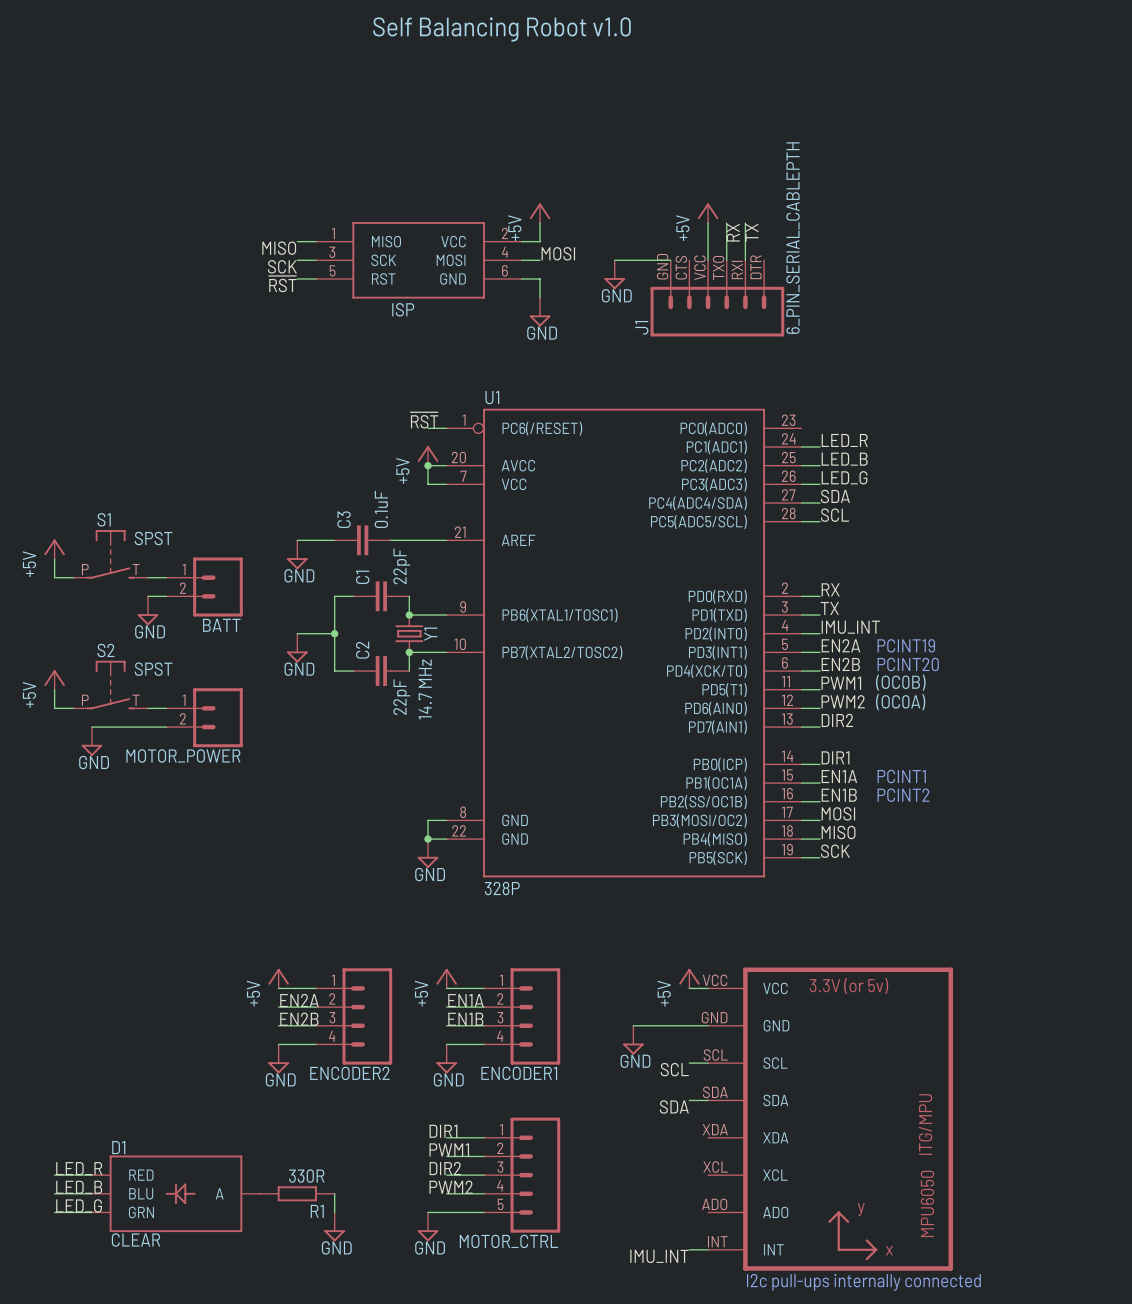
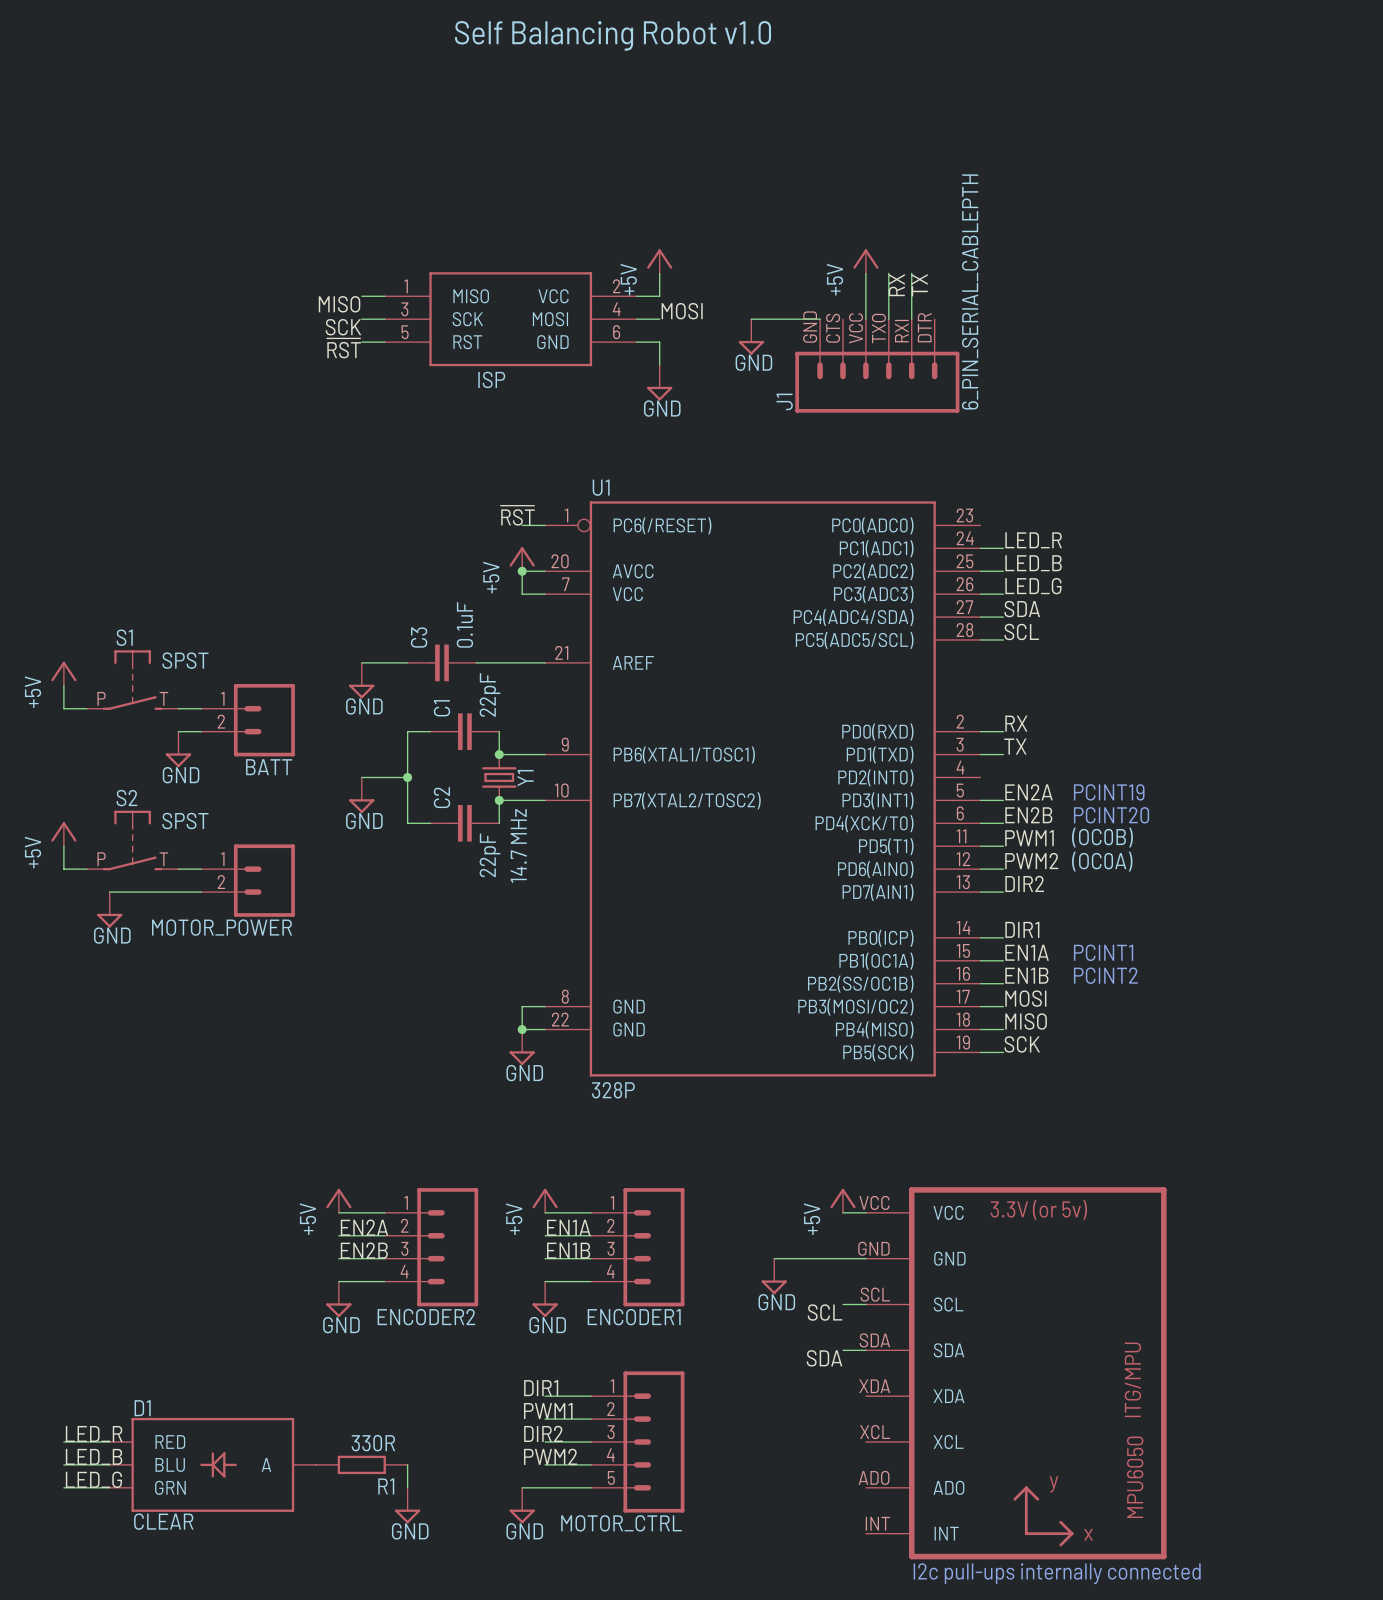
label: IMU_INT (850, 627) -> none
wire: (801, 633) (820, 633) -> none
wire: (689, 1249) (708, 1249) -> none
label: IMU_INT (659, 1256) -> none

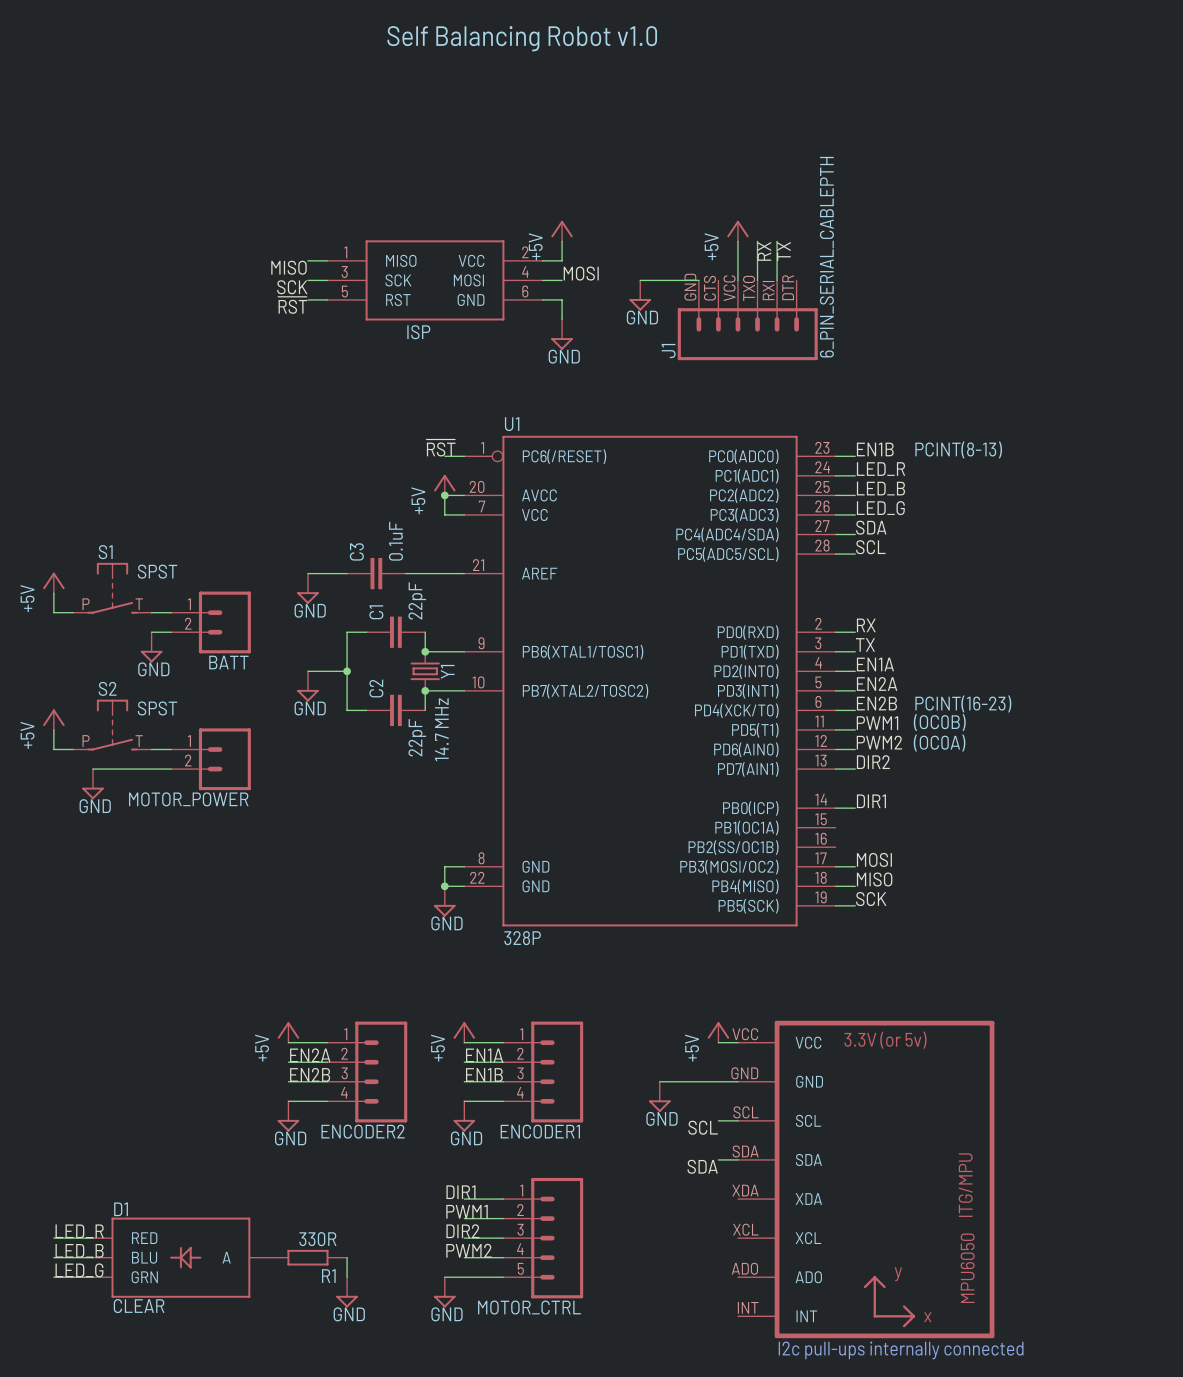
label: none -> EN1B (875, 449)
text: none -> PCINT(8-13) (958, 449)
wire: none -> (835, 456) (855, 456)
text: PCINT19 (1109, 792) -> none
text: PCINT20 (1111, 815) -> PCINT(16-23) (963, 703)
label position: EN1A (1027, 952) -> EN1A (875, 664)
text: PCINT1 (1103, 952) -> none
wire: (980, 960) (1003, 960) -> (835, 671) (855, 671)
label: EN1B (1026, 975) -> none
text: PCINT2 (1105, 975) -> none
wire: (980, 983) (1003, 983) -> none

